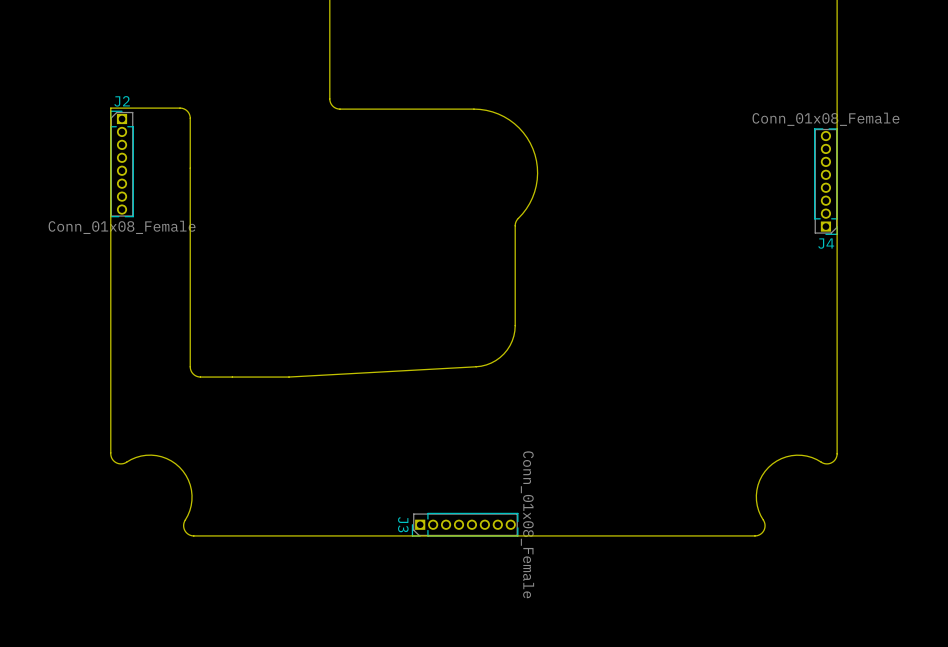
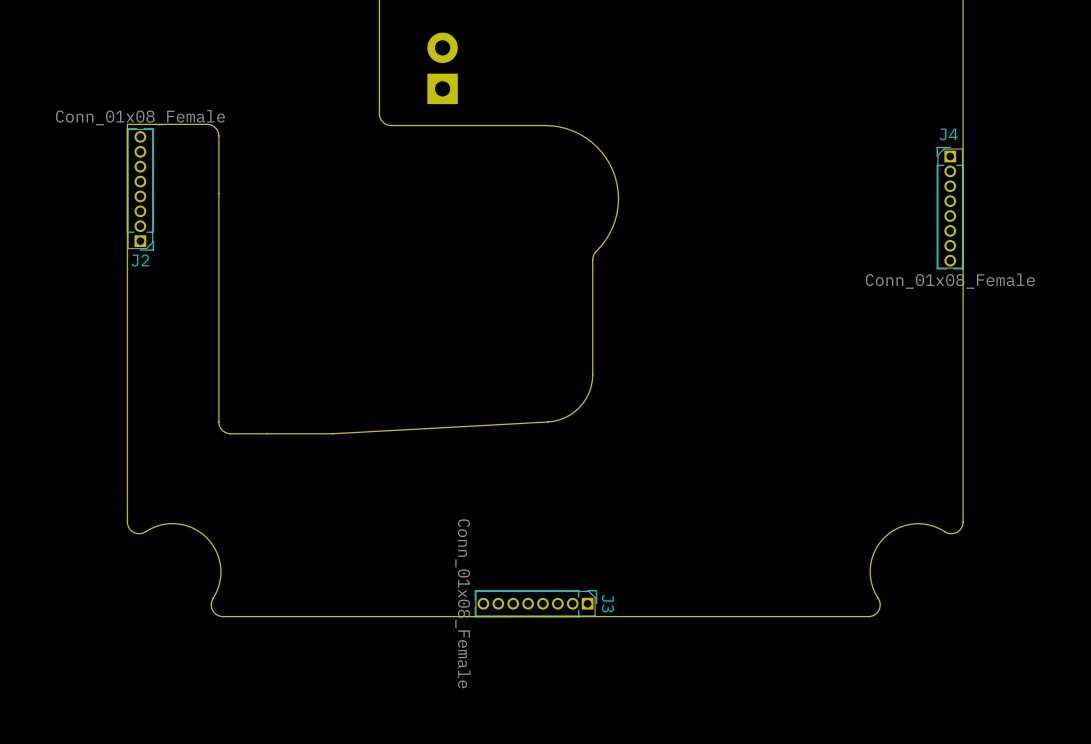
part: none -> (442, 68)
J2 rotation: 0° (122, 163) -> 180° (140, 189)
J4 rotation: 0° (825, 181) -> 180° (950, 208)
J3 rotation: 0° (465, 524) -> 180° (535, 603)

